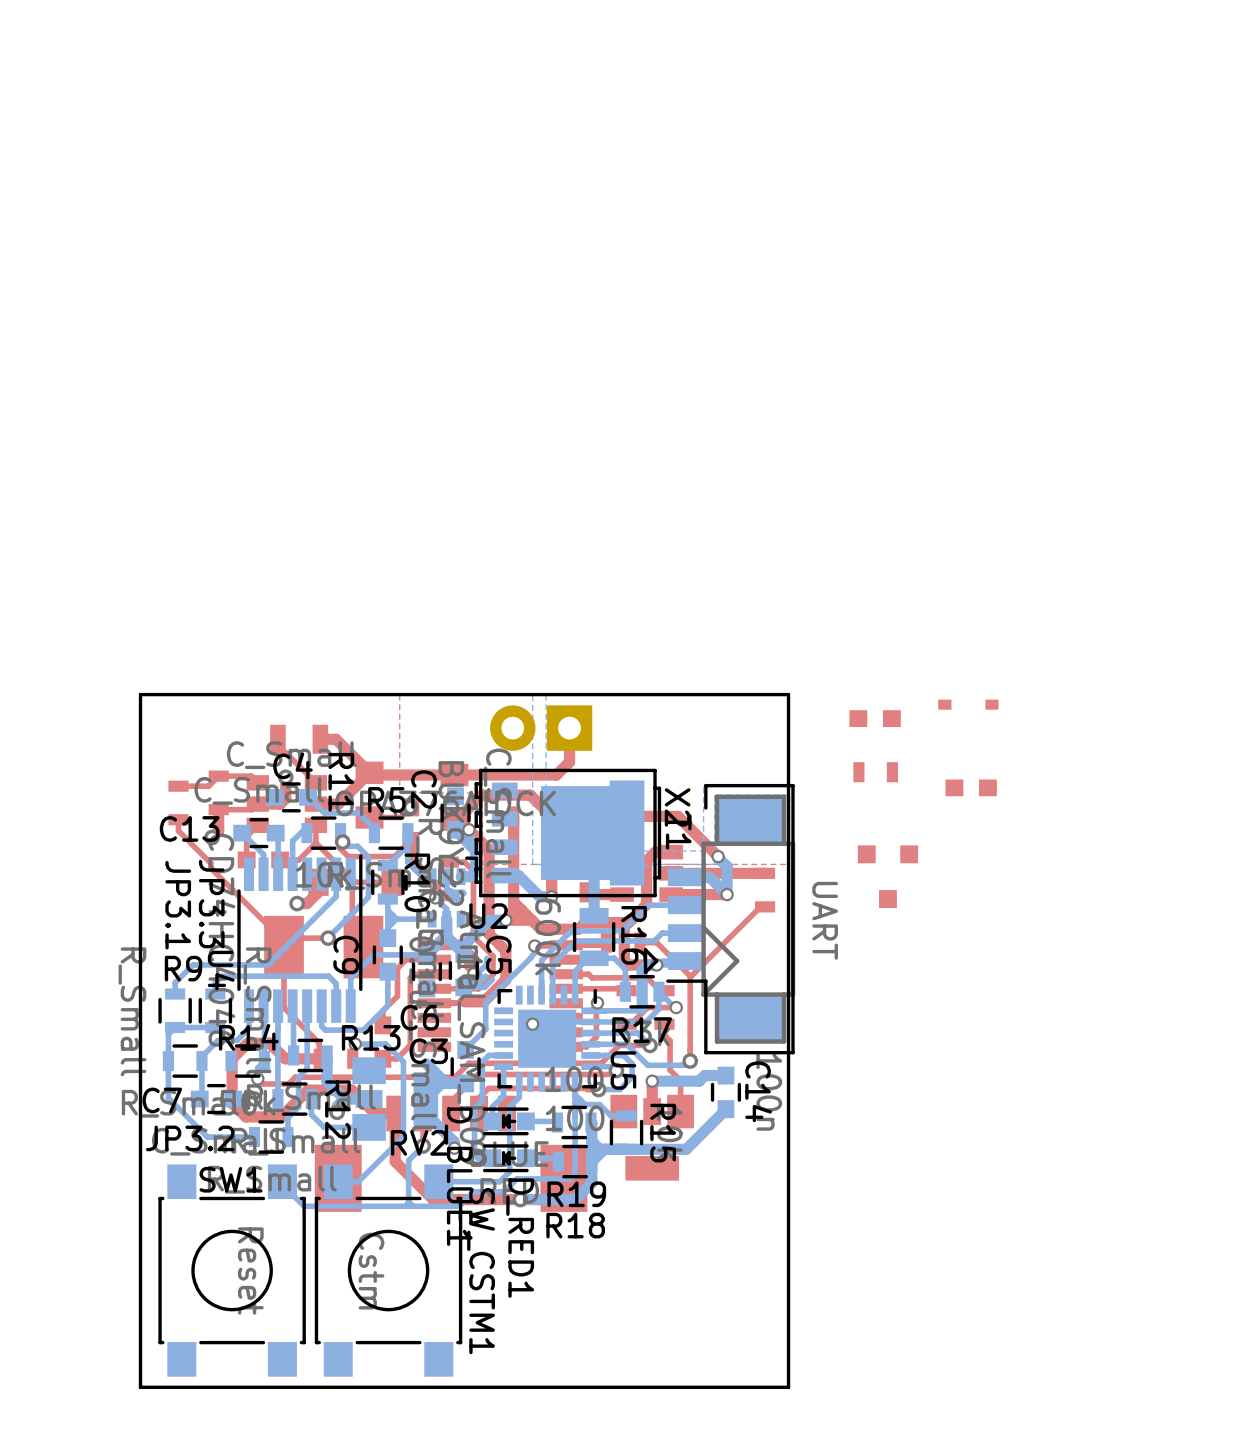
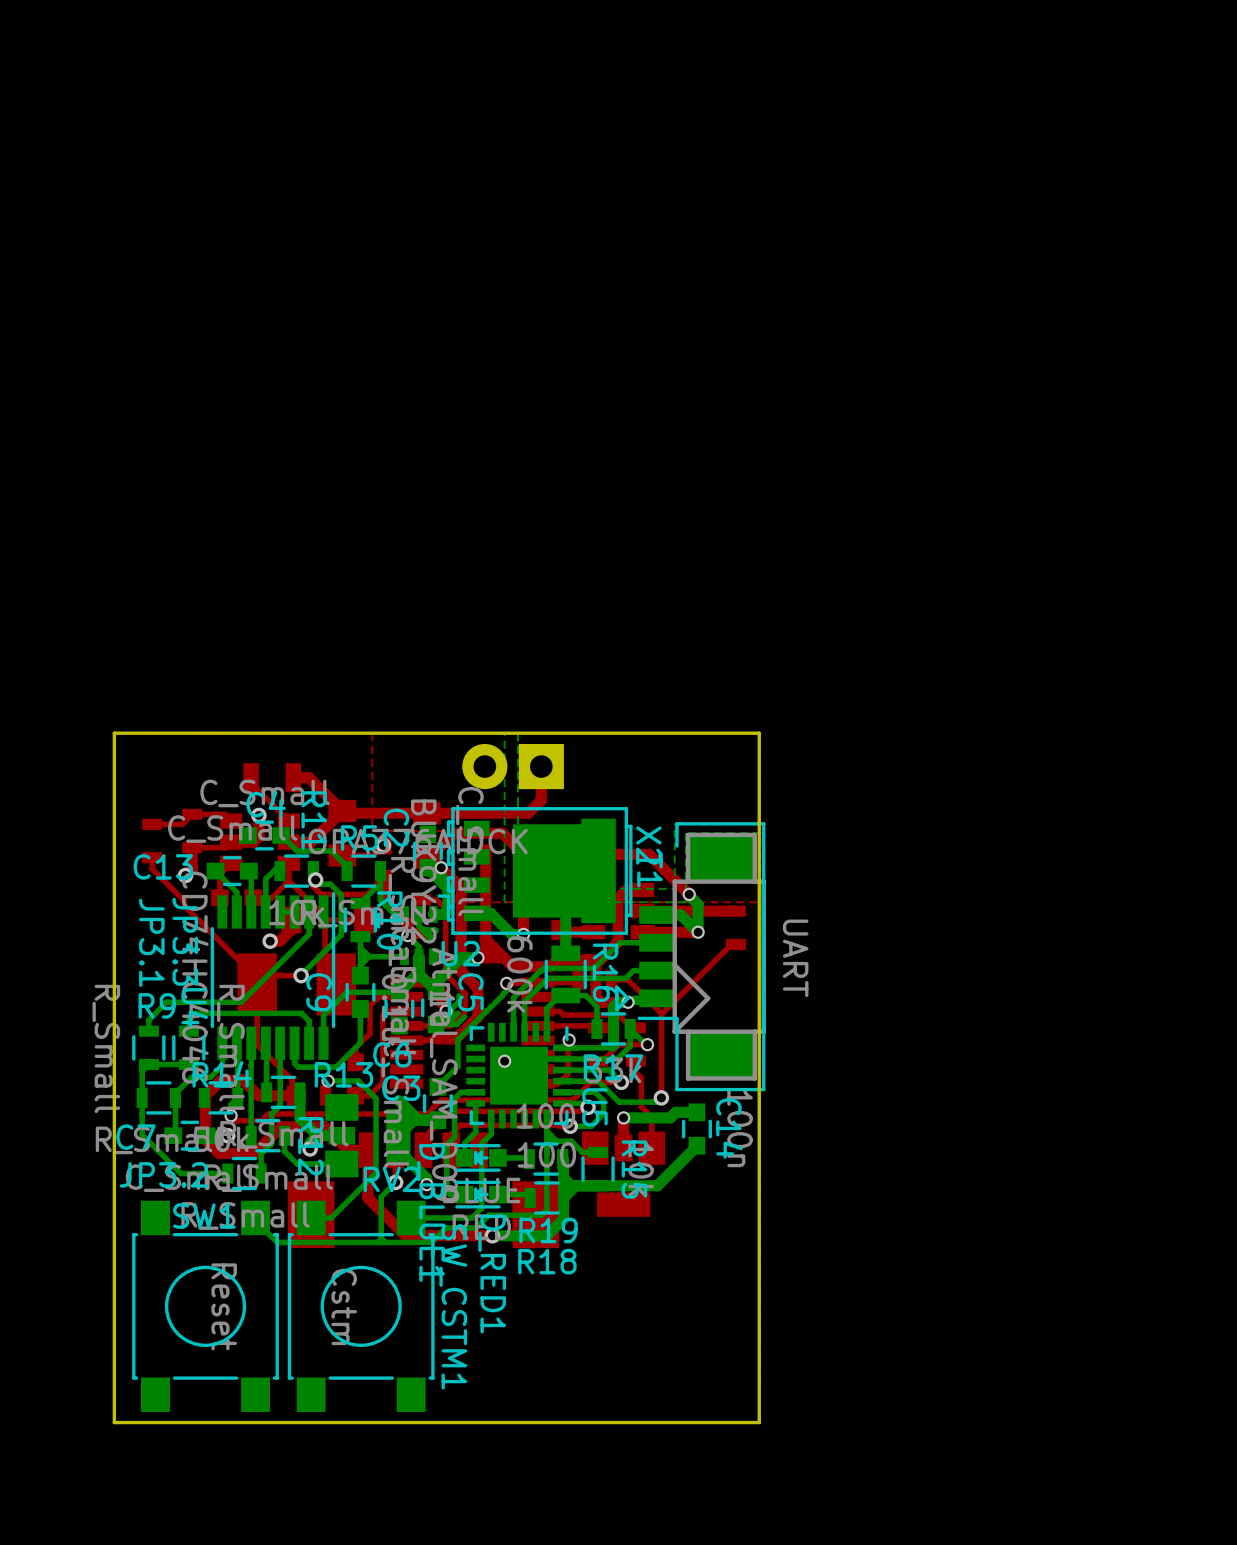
part: (968, 704) -> none
part: (875, 718) -> none
part: (875, 772) -> none
part: (971, 787) -> none
part: (887, 876) -> none

